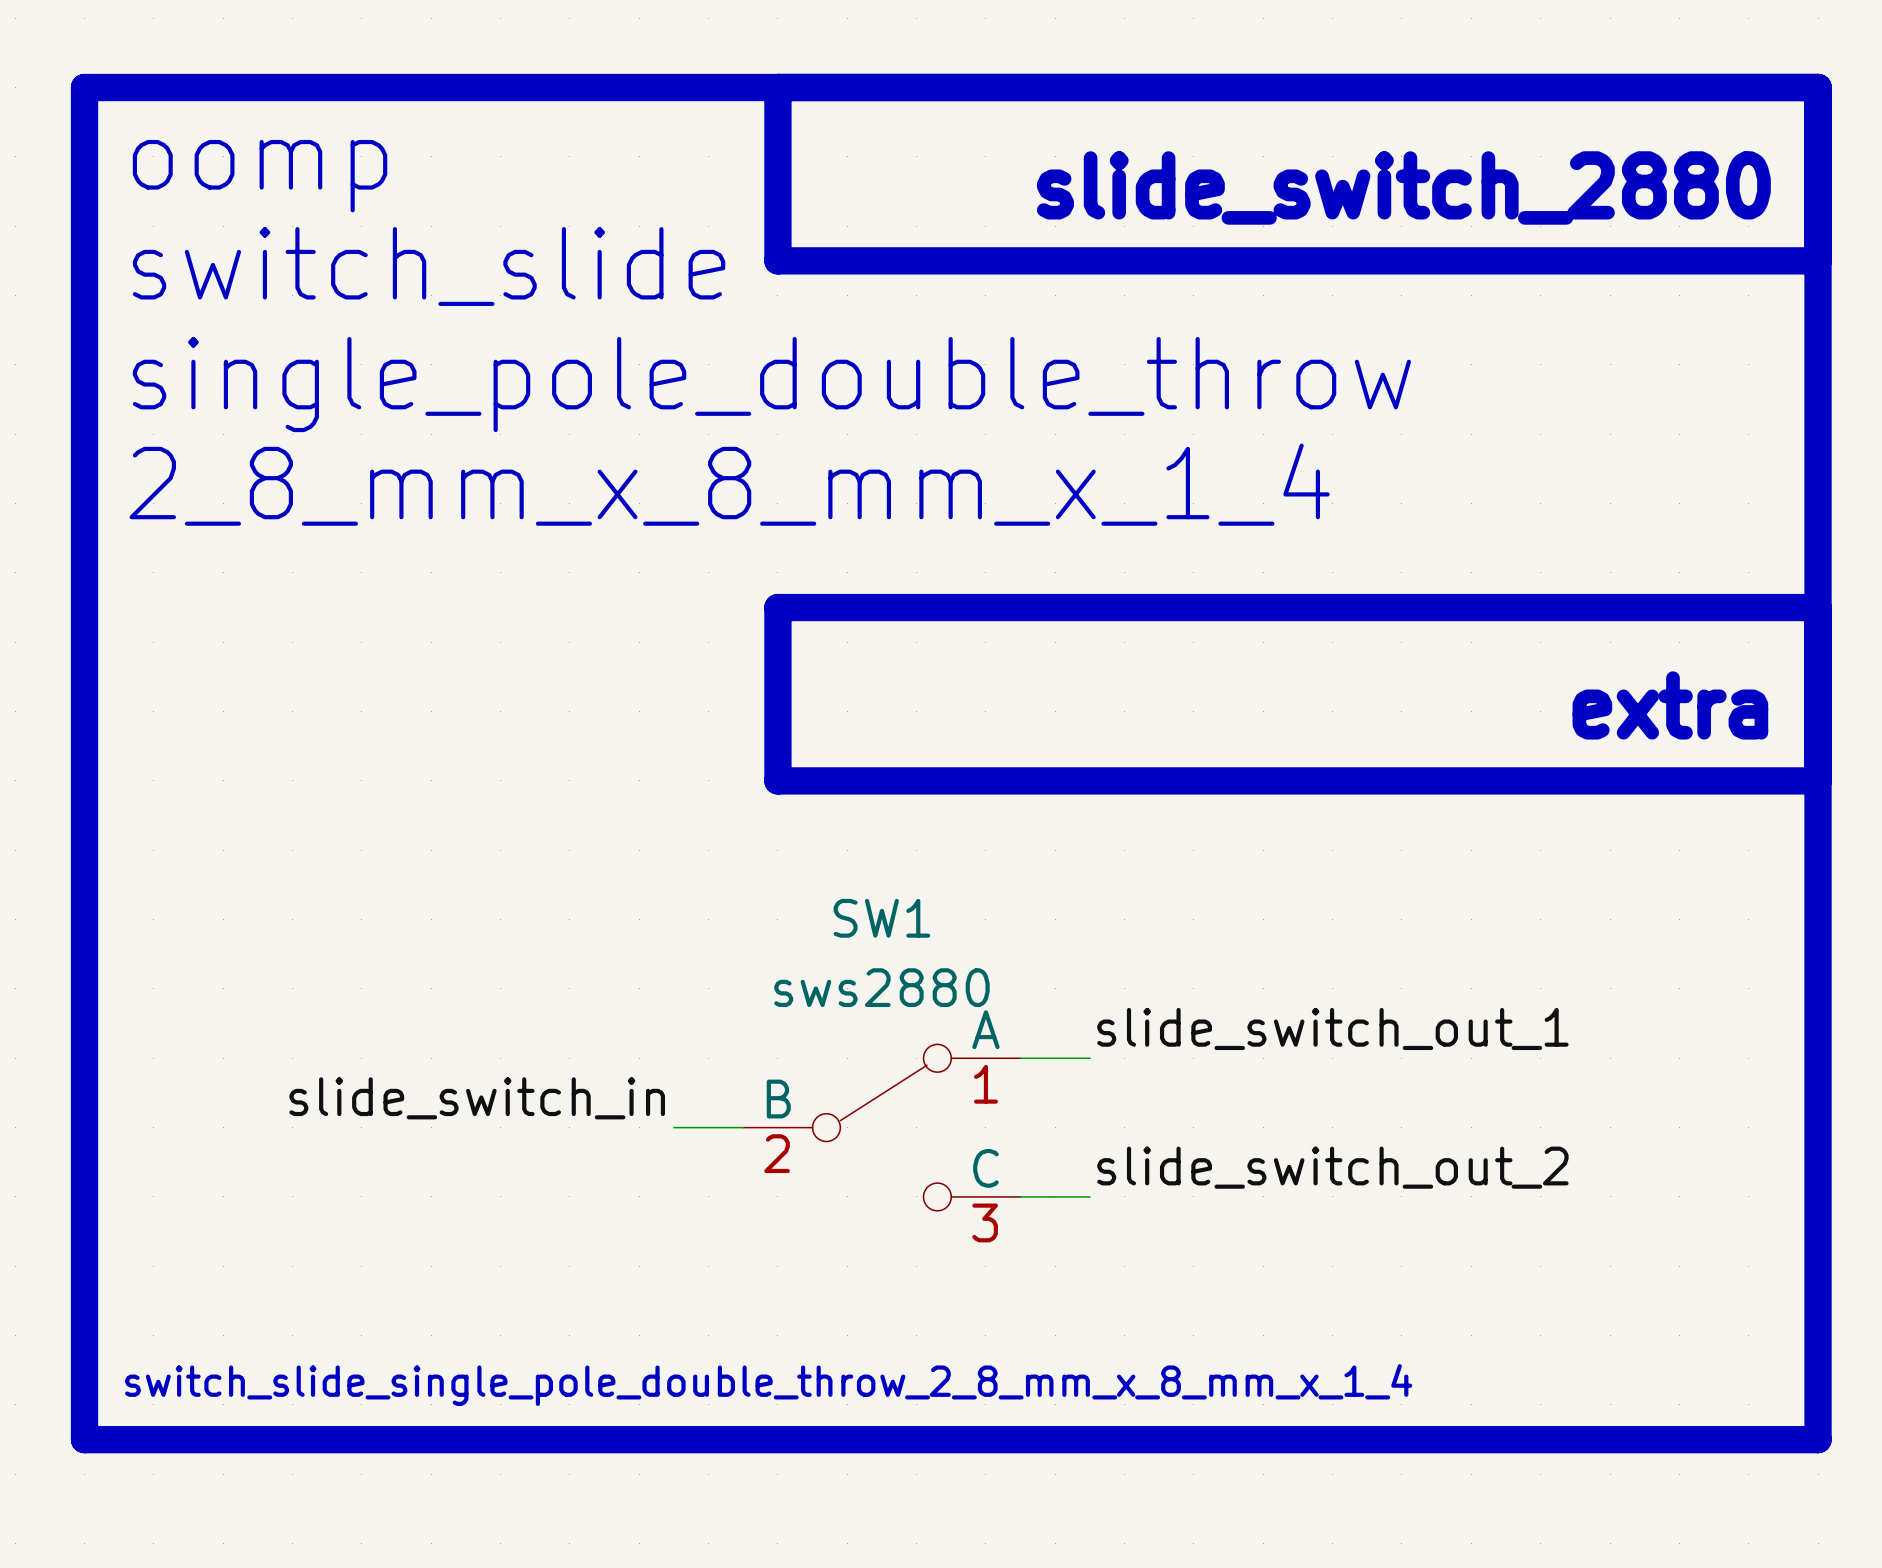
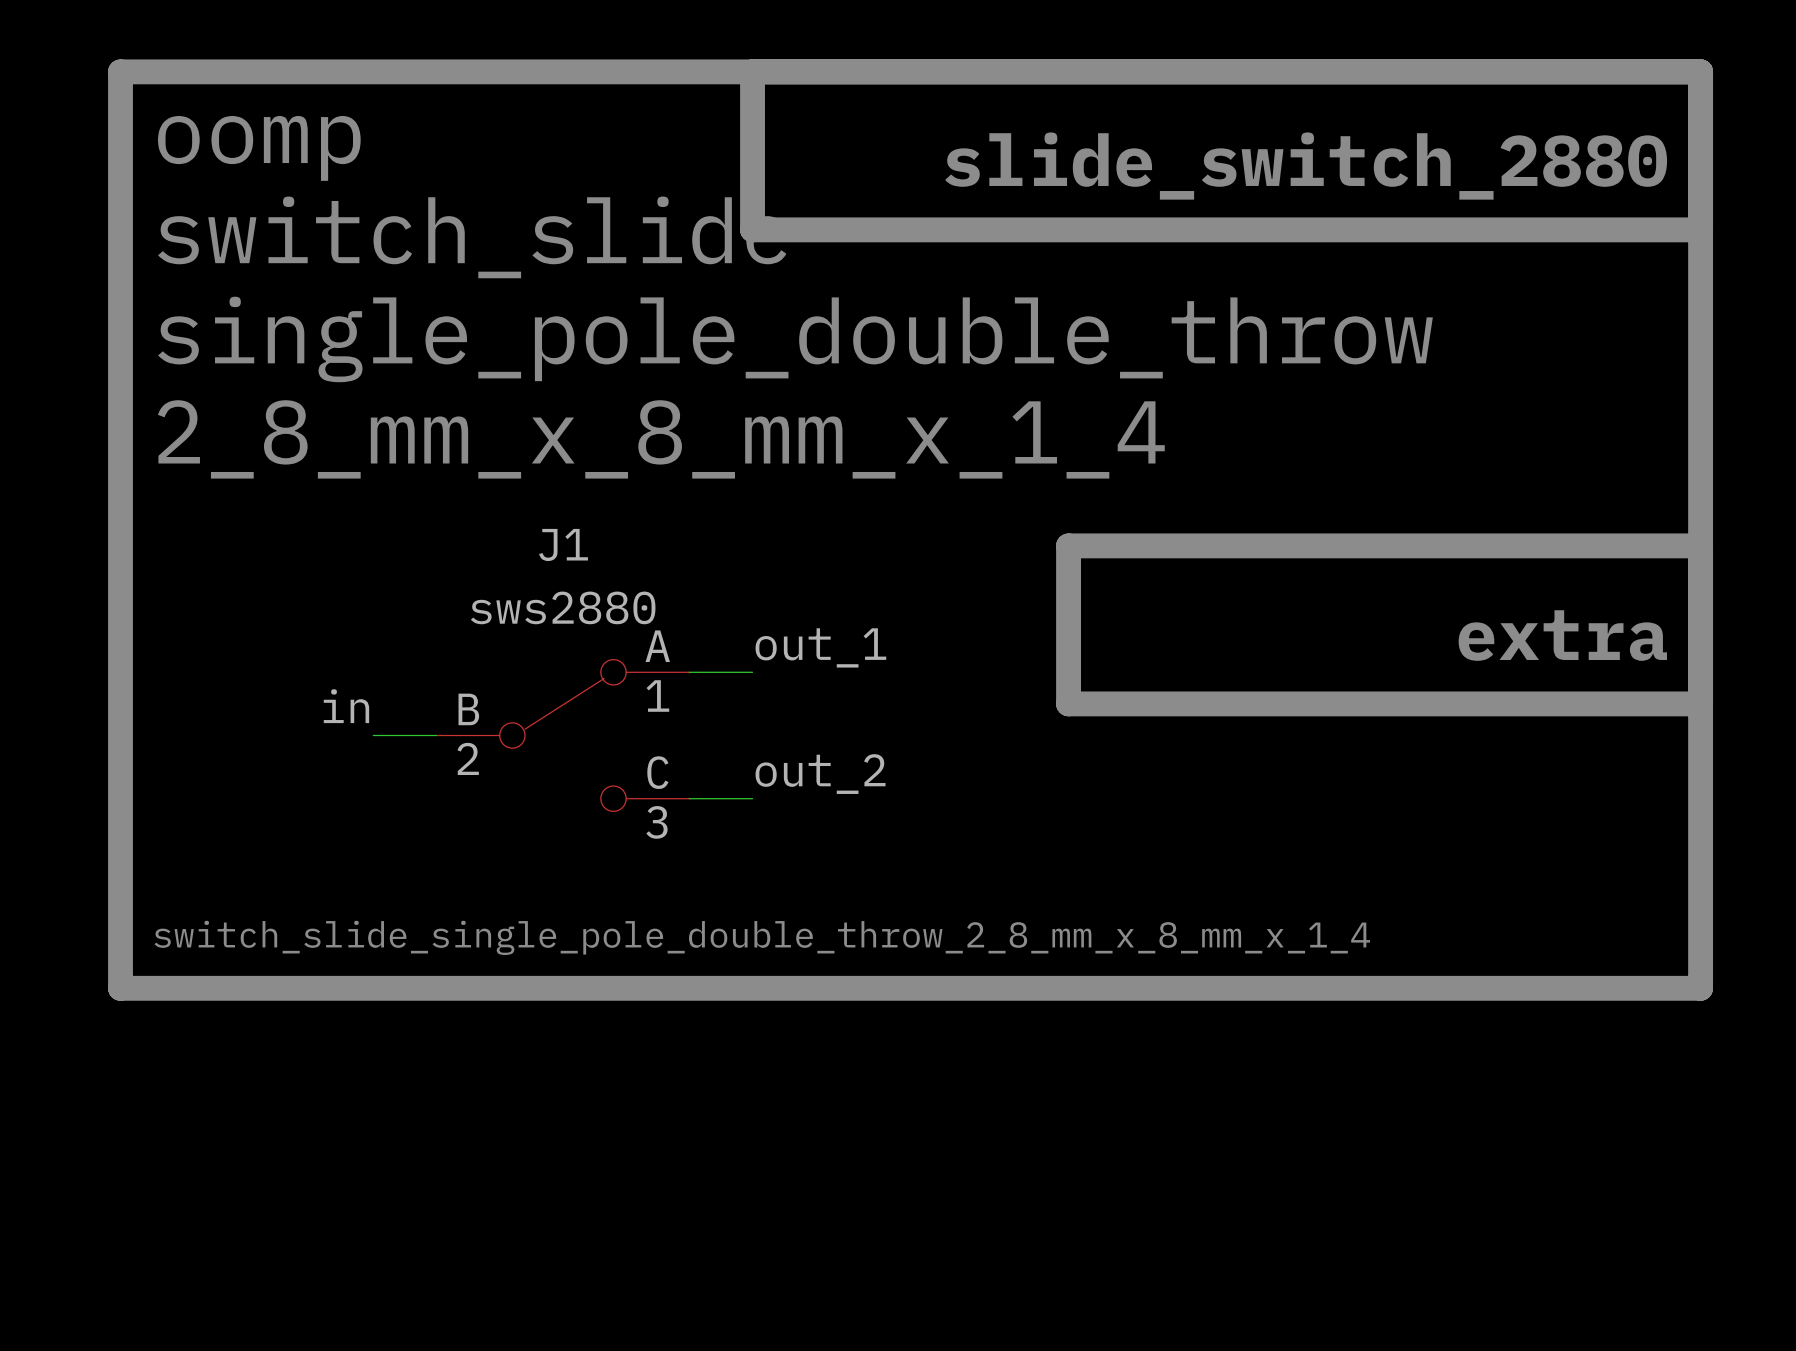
line: (1124, 607) (777, 607) (777, 780) (1124, 780) -> (1068, 545) (1068, 703)
label: none -> out_1 (820, 647)
label: none -> in (346, 706)
J1: none -> sws2880 (562, 735)
label: none -> out_2 (820, 774)
label: slide_switch_out_1 (1332, 1028) -> none
wire: (1020, 1058) (1089, 1058) -> (689, 672) (752, 672)
line: (84, 1092) (84, 1439) (1818, 1439) (1818, 1092) -> (120, 988) (1700, 988)
label: slide_switch_in (477, 1098) -> none
wire: (673, 1127) (743, 1127) -> (373, 735) (436, 735)
SW1: sws2880 (881, 1127) -> none
label: slide_switch_out_2 (1332, 1167) -> none
wire: (1020, 1196) (1089, 1196) -> (689, 798) (752, 798)
text position: switch_slide_single_pole_double_throw_2_8_mm_x_8_mm_x_1_4 (768, 1385) -> switch_slide_single_pole_double_throw_2_8_mm_x_8_mm_x_1_4 (762, 937)

